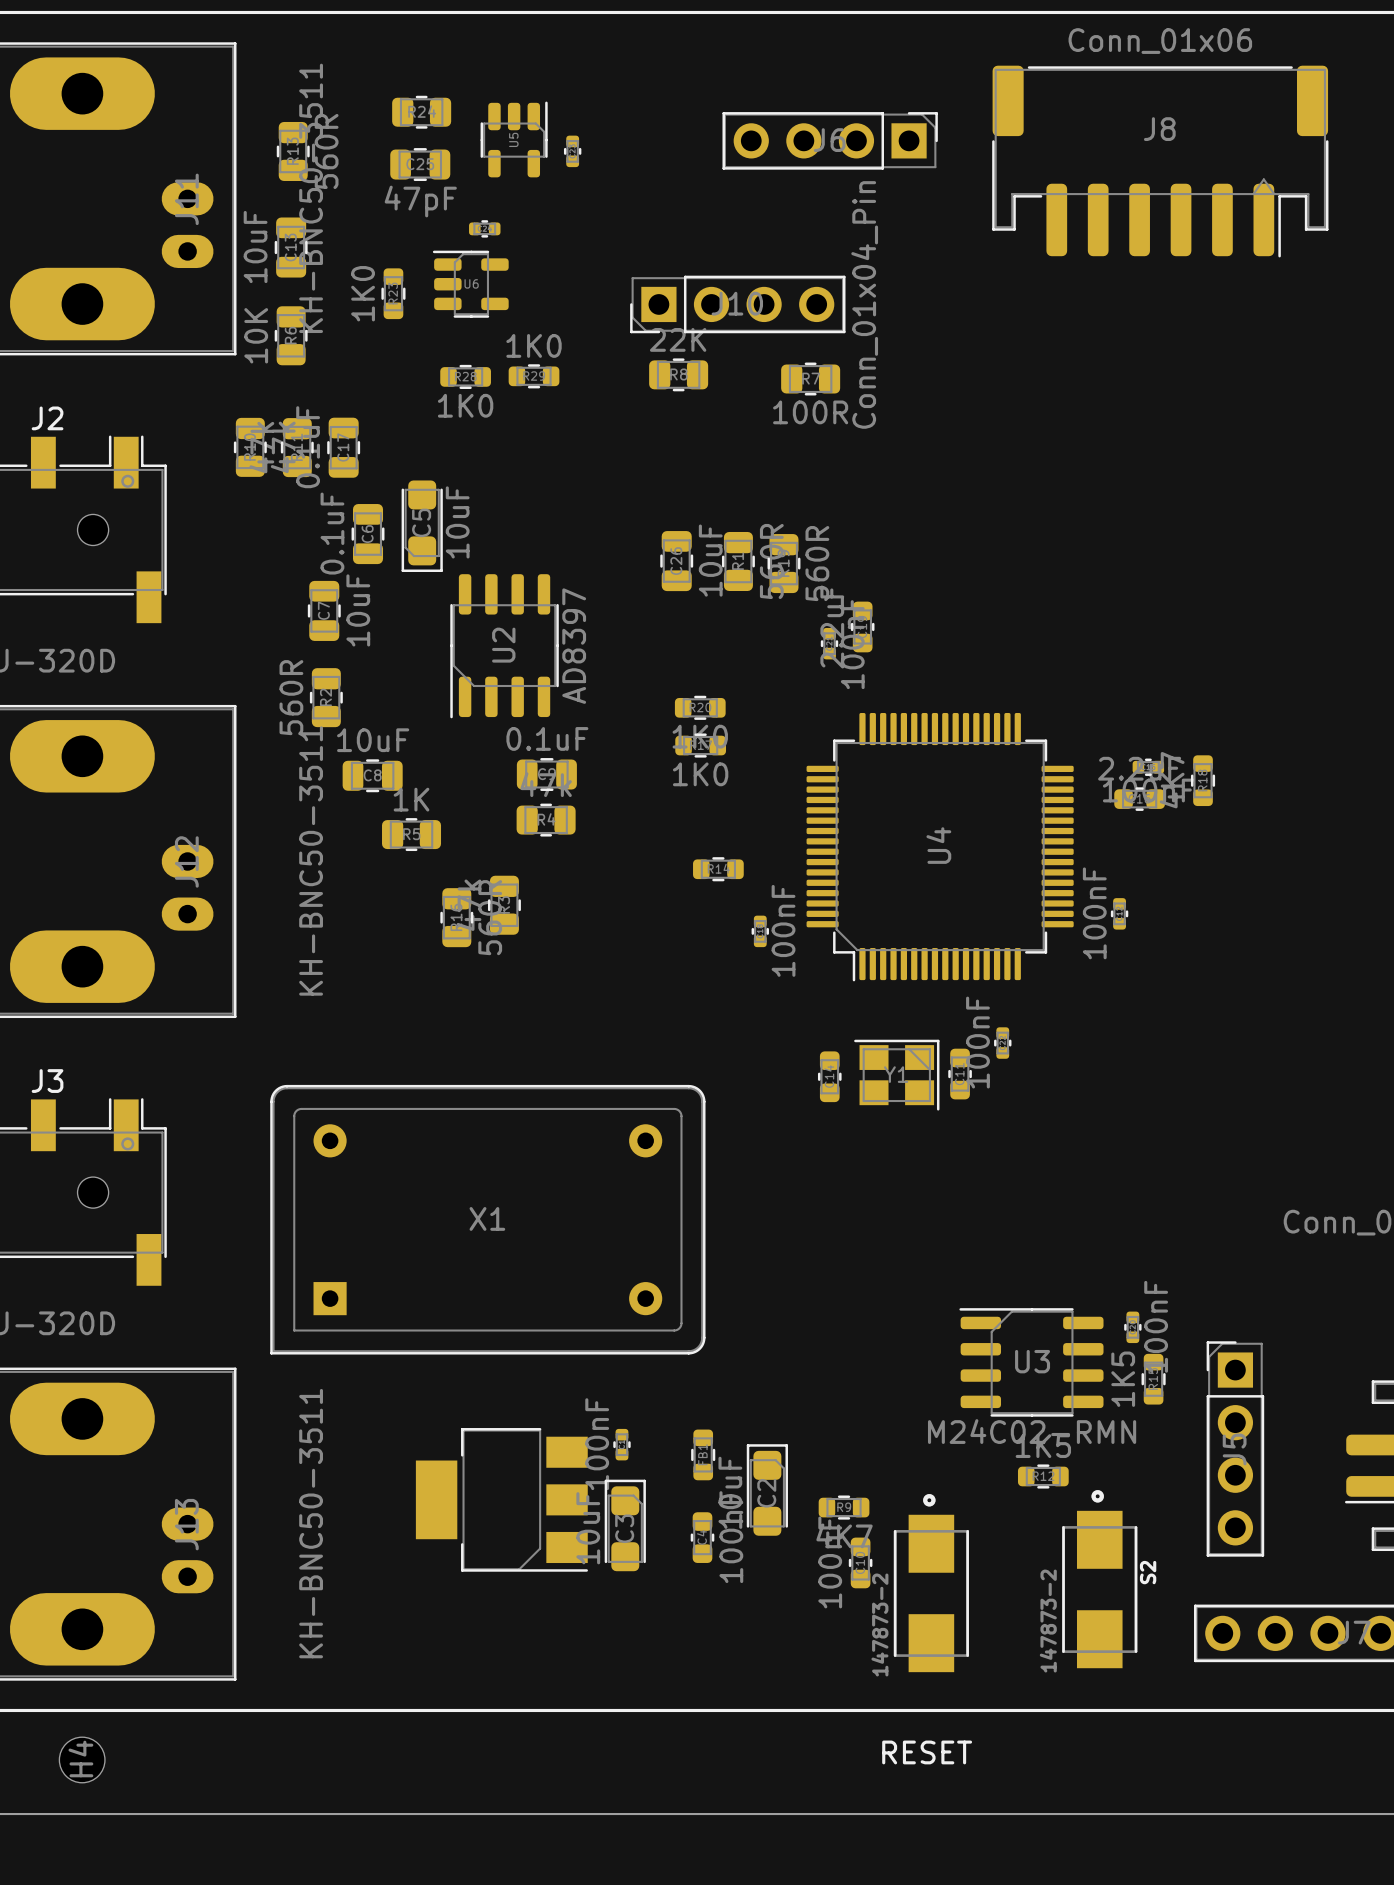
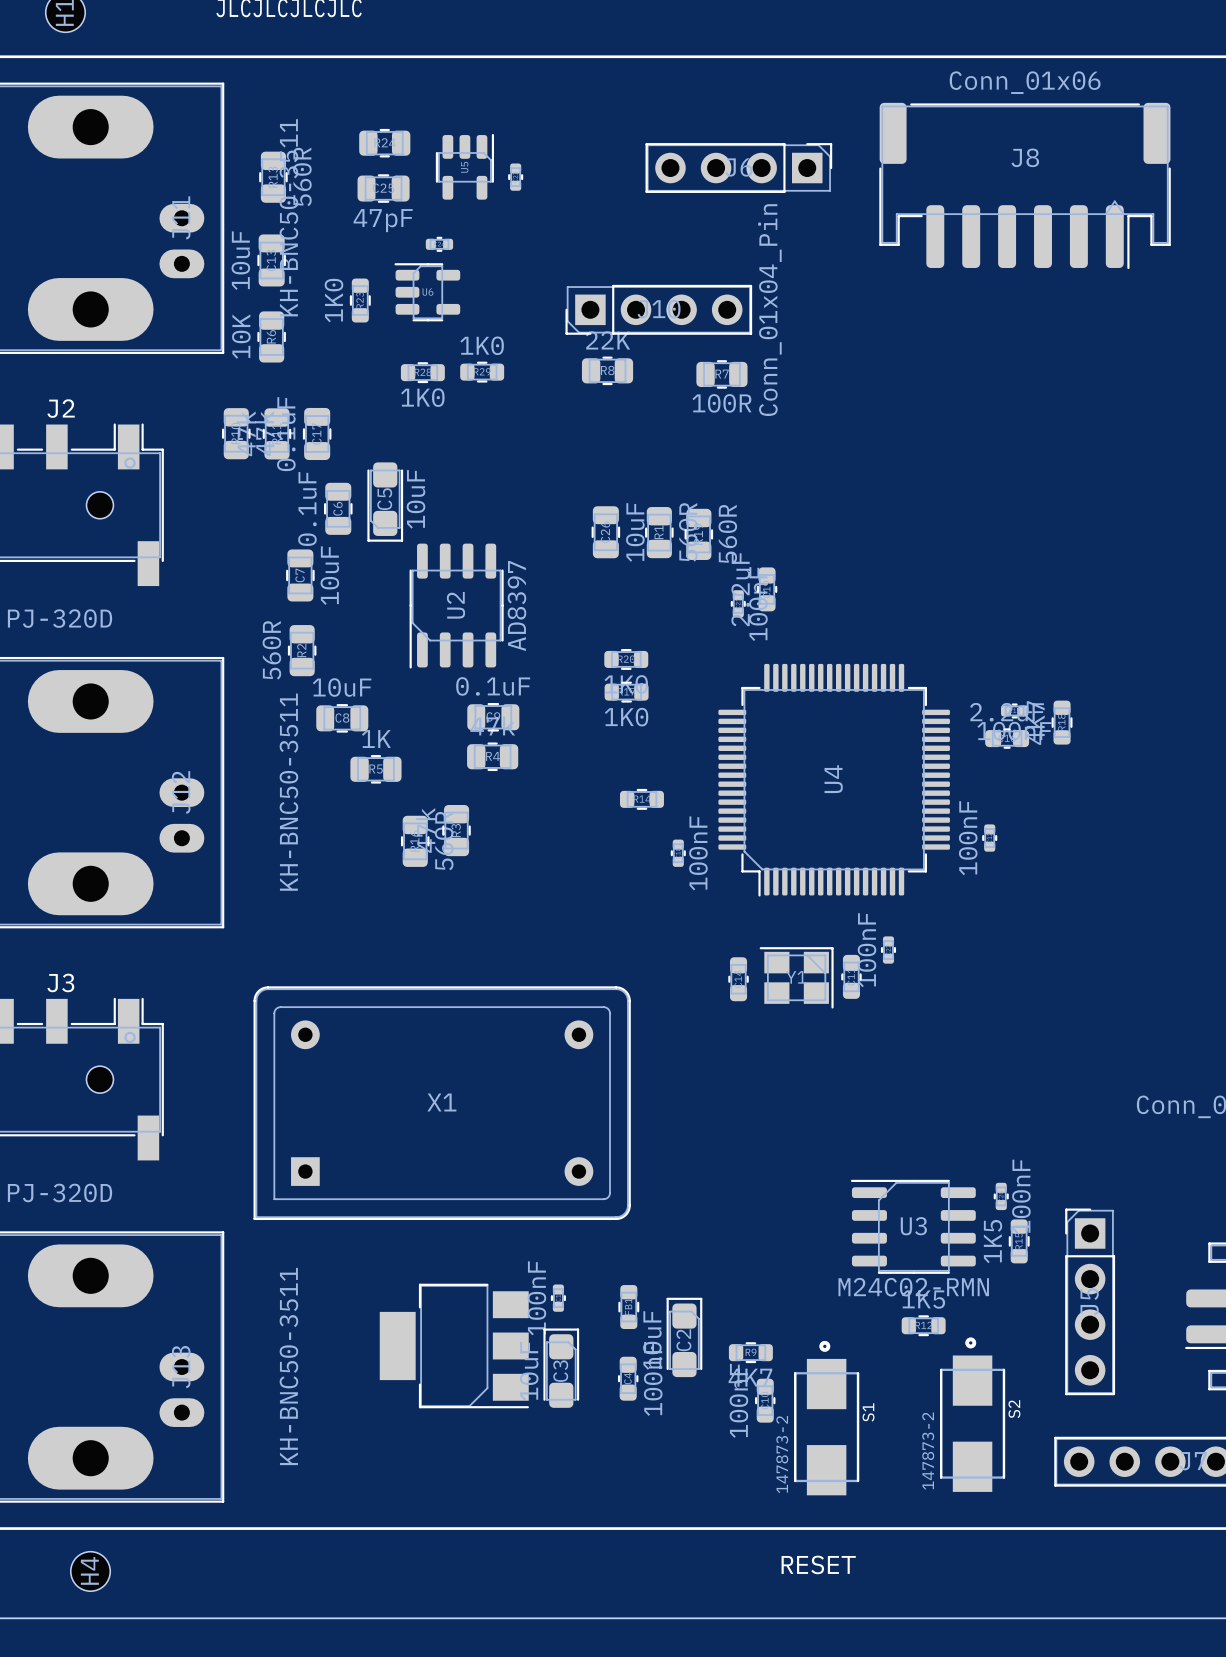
S1 name: none -> S1 (868, 1412)

